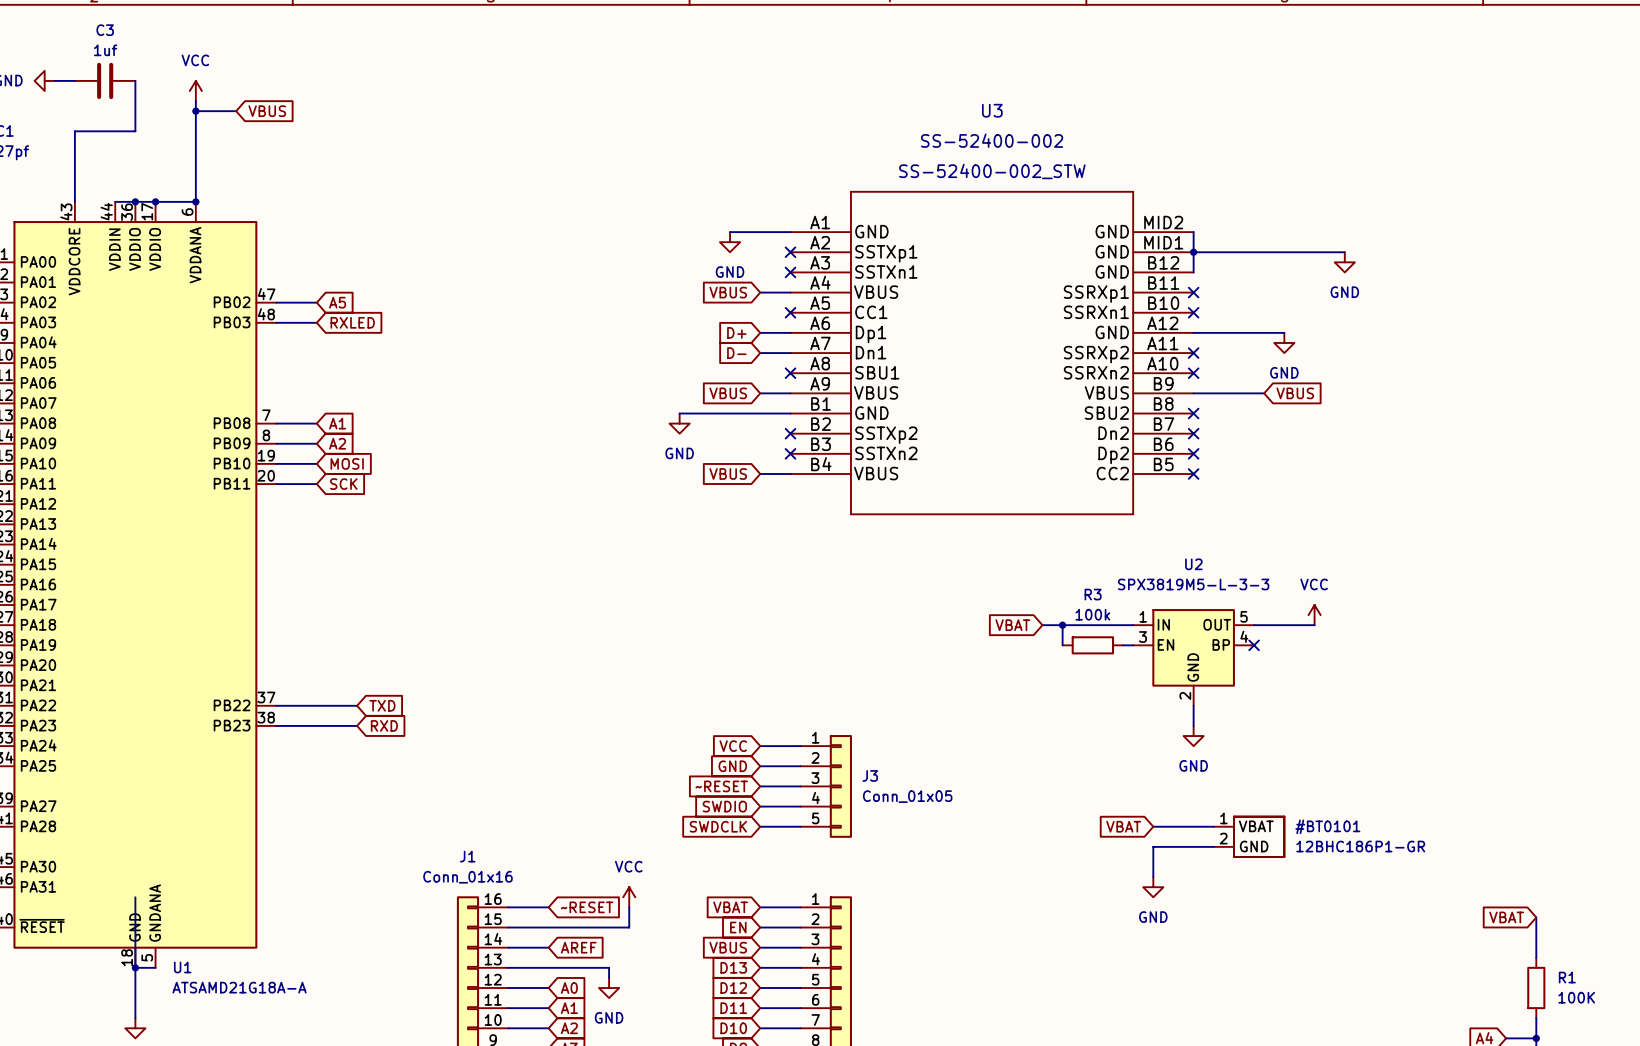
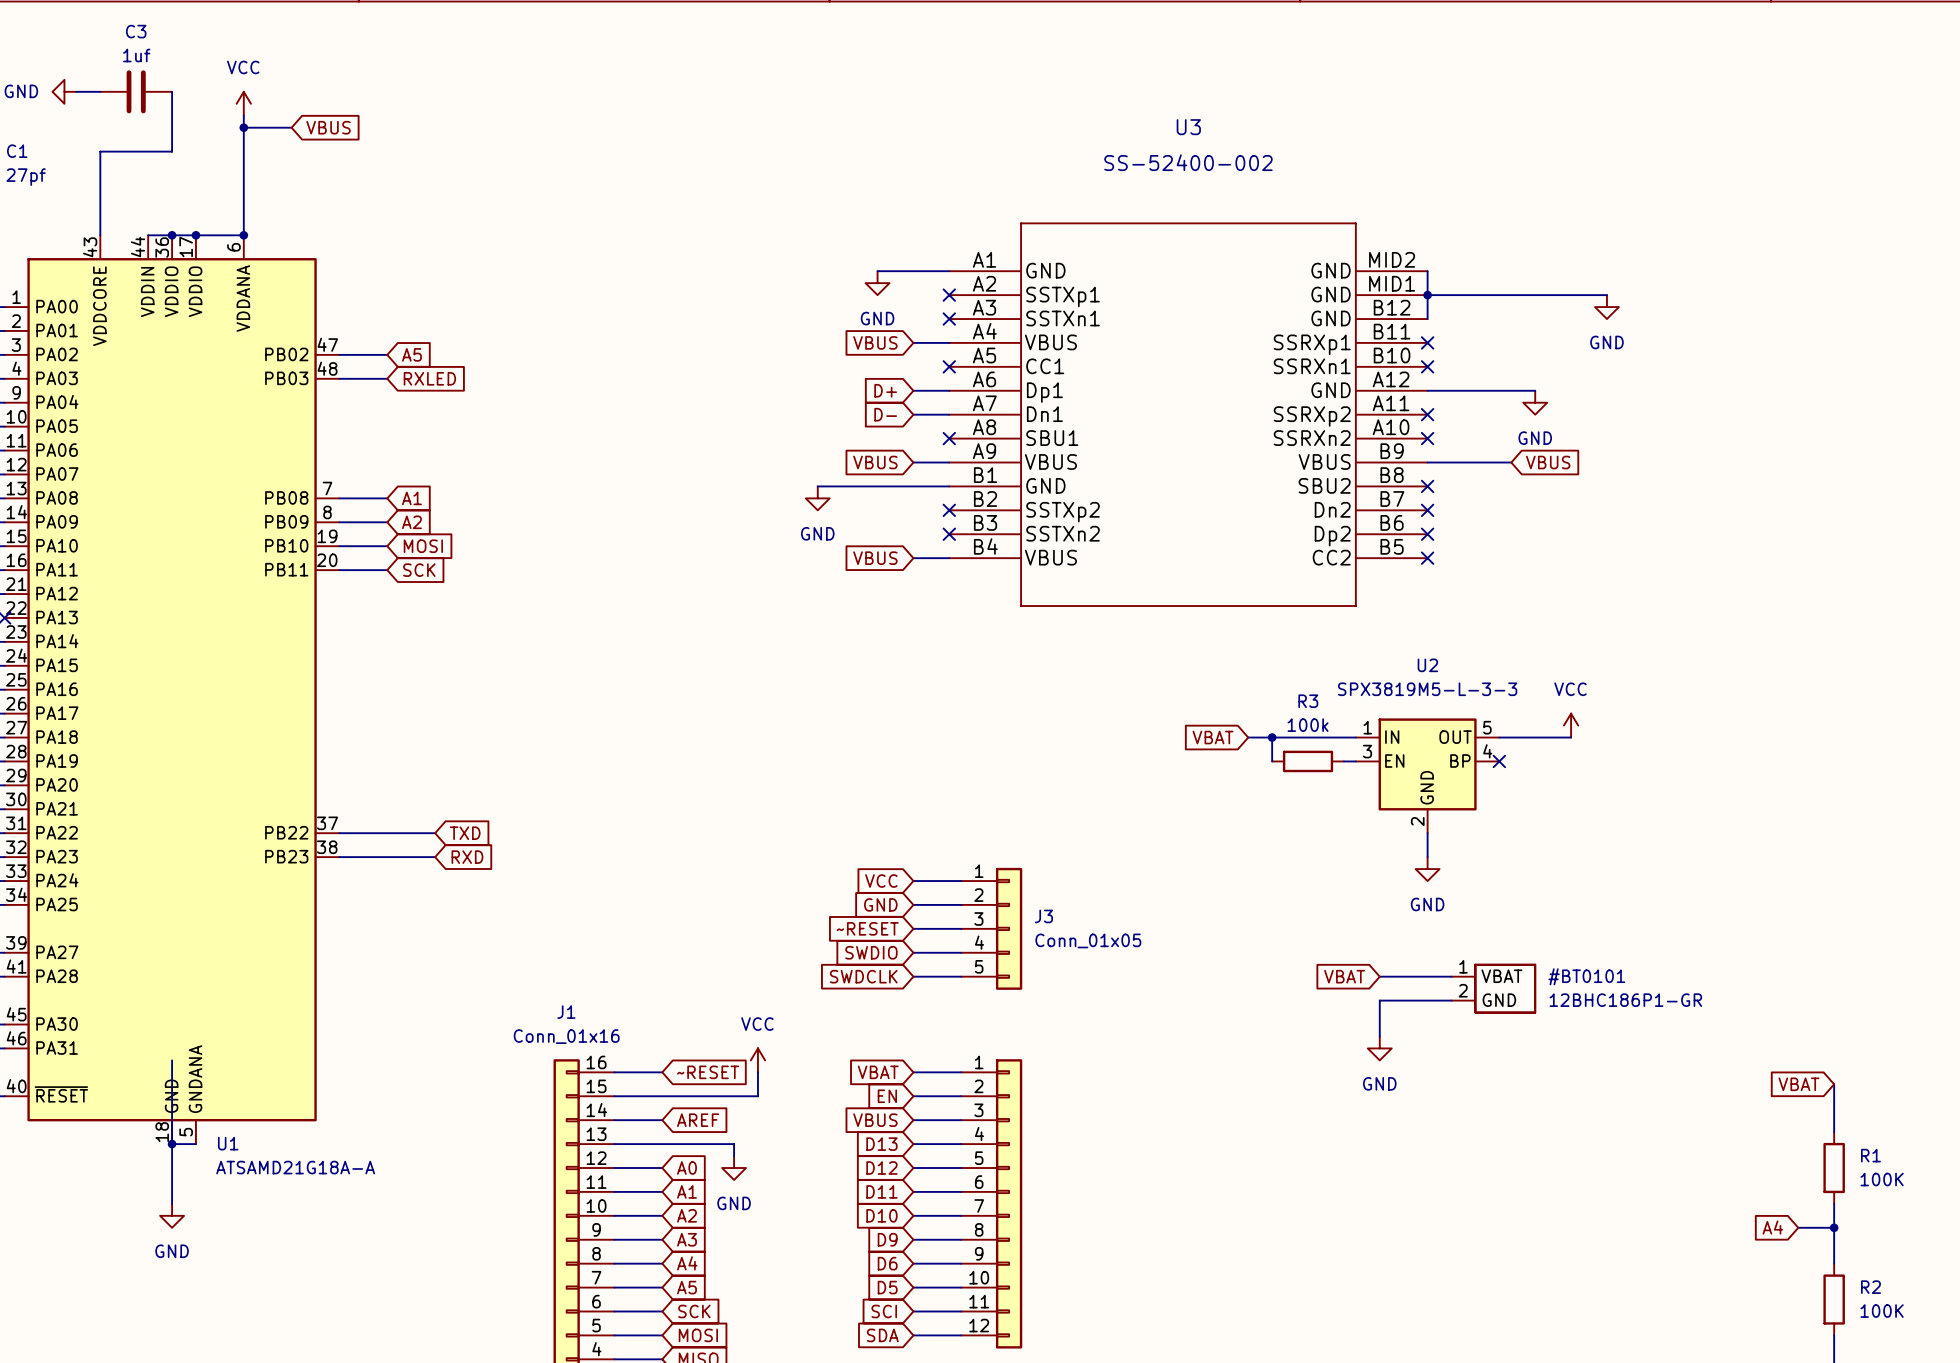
U3 text: SS-52400-002_STW (992, 171) -> none

